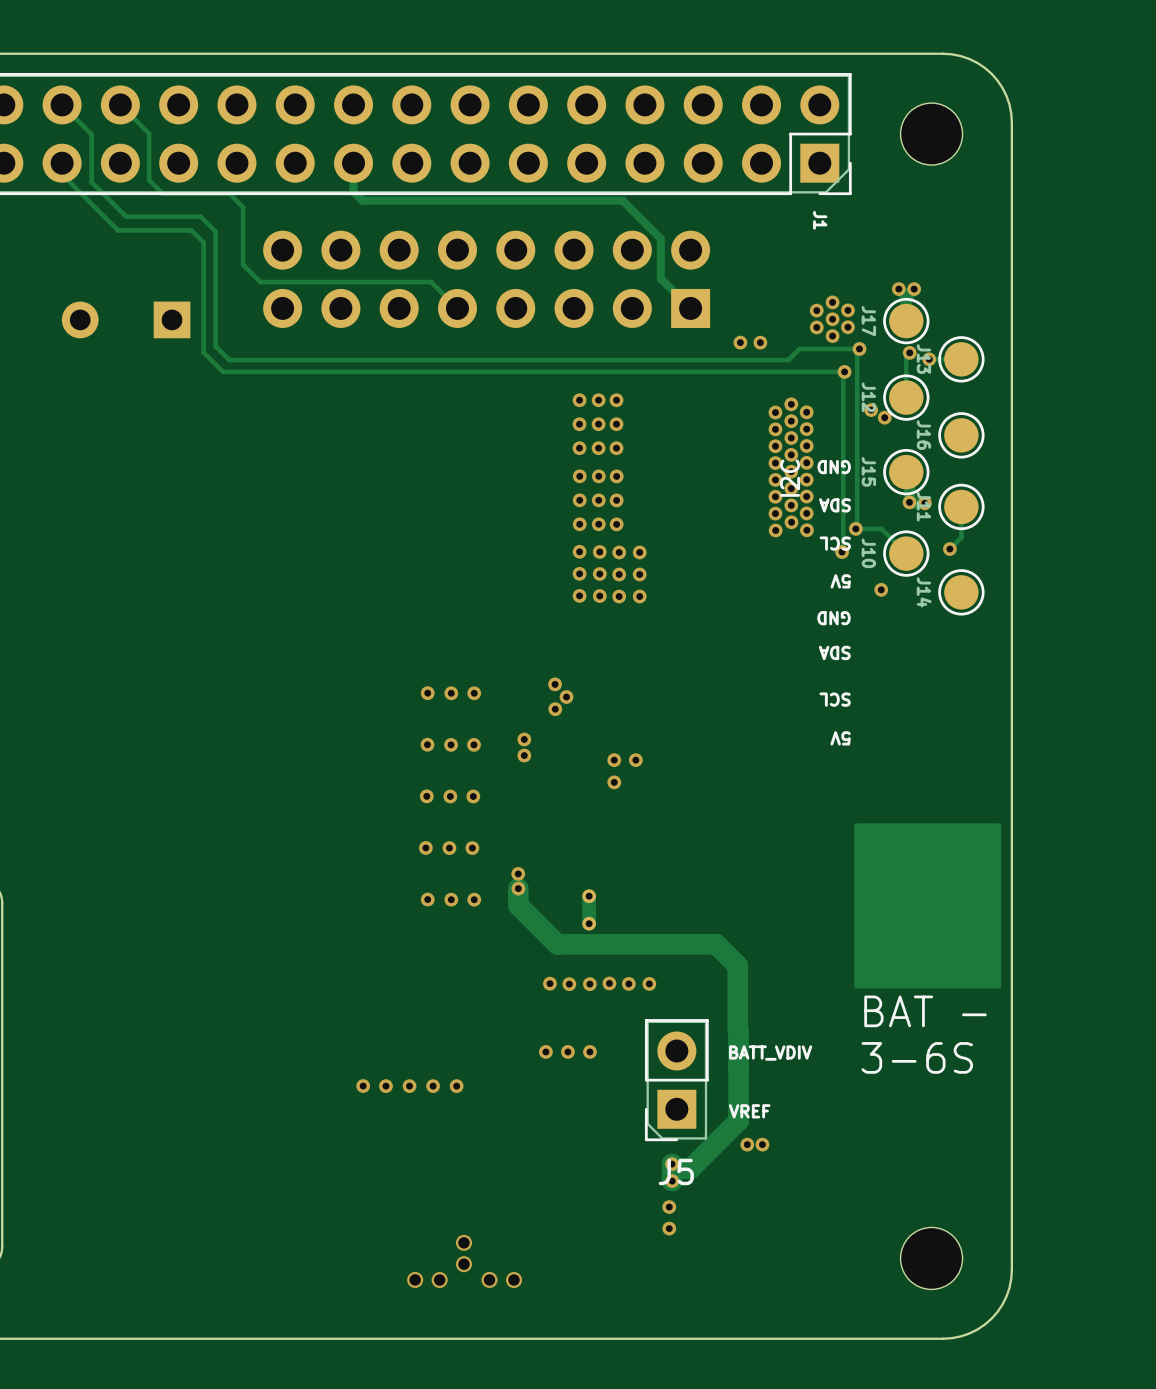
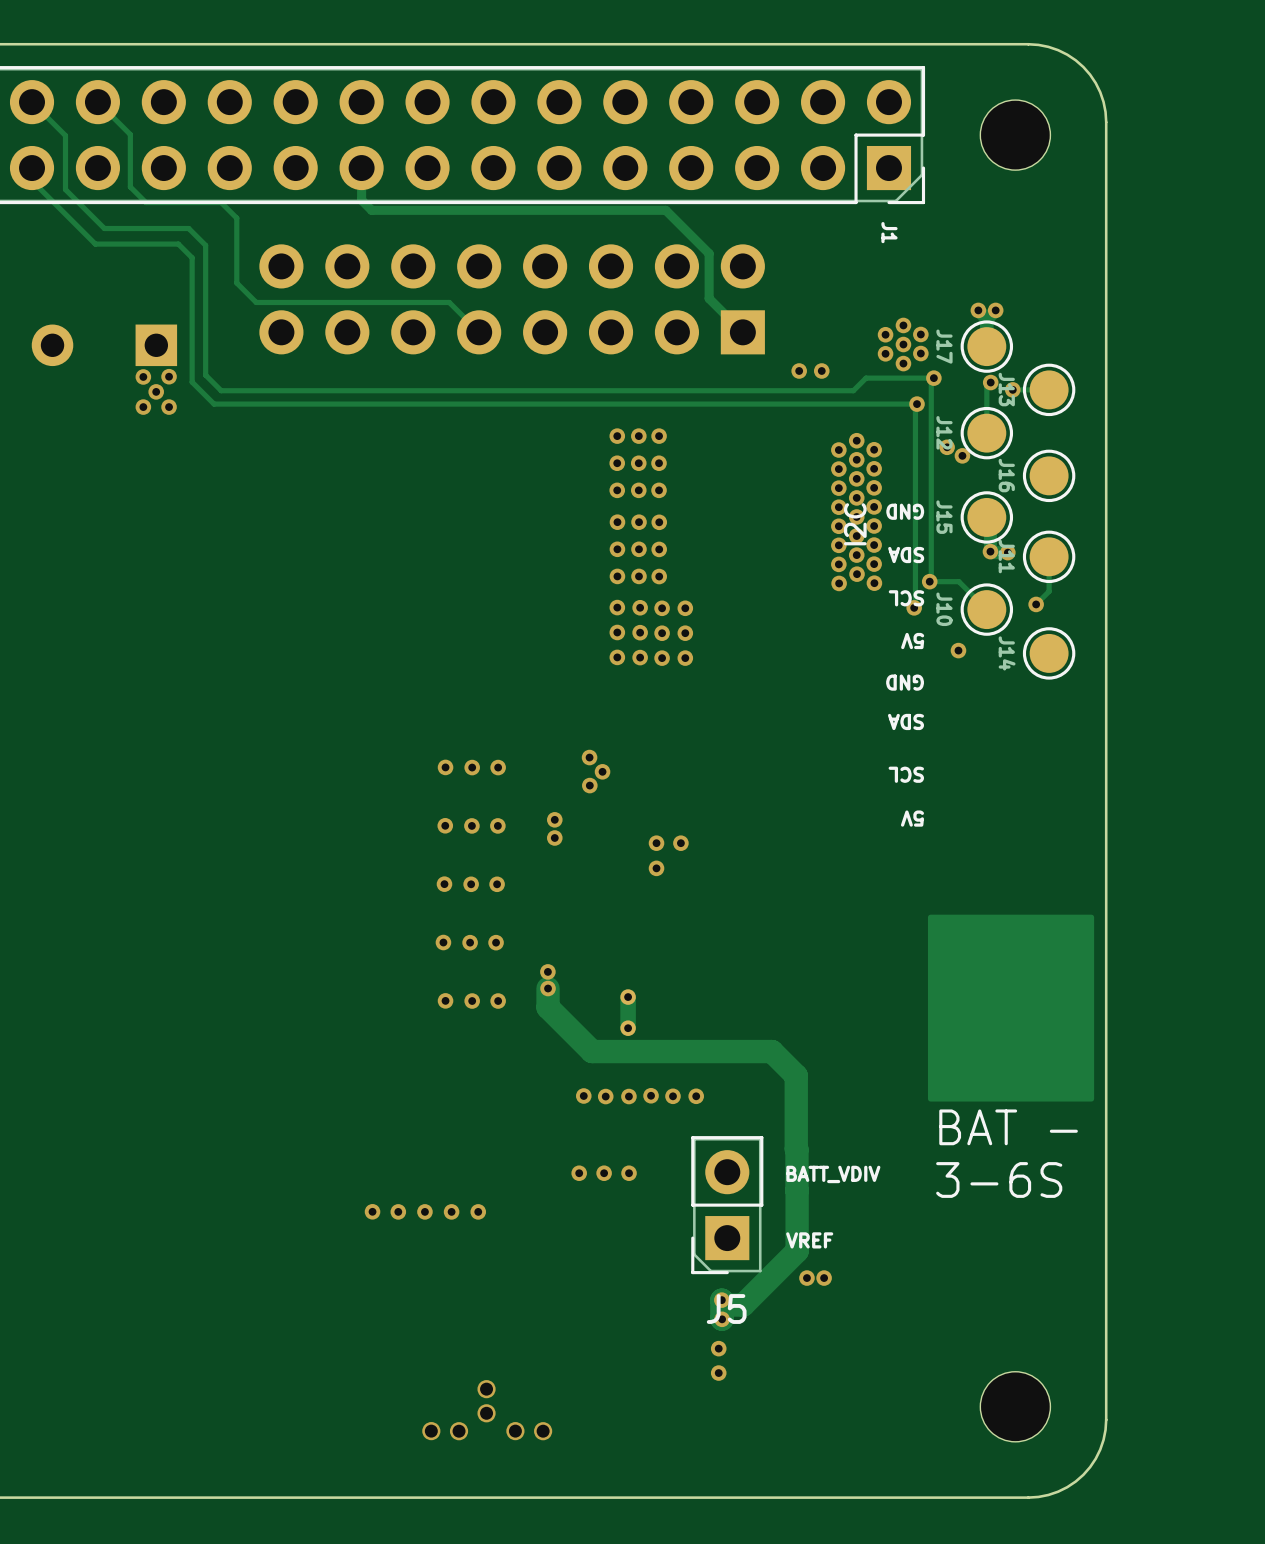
via: none -> (143, 376)
via: none -> (169, 376)
via: none -> (156, 391)
via: none -> (143, 407)
via: none -> (169, 407)

